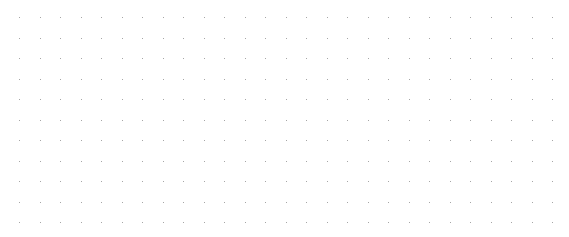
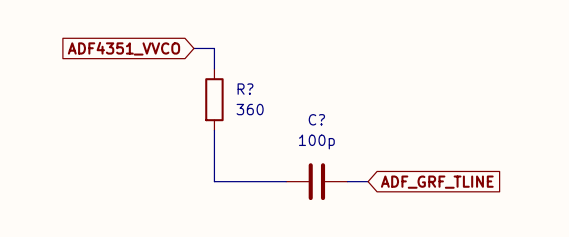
global label: none -> ADF4351_VVCO (123, 48)
wire: none -> (193, 48) (214, 48) (214, 68)
R?: none -> 360 (214, 99)
wire: none -> (214, 130) (214, 181) (286, 181)
C?: none -> 100p (316, 181)
wire: none -> (347, 181) (368, 181)
global label: none -> ADF_GRF_TLINE (437, 182)

